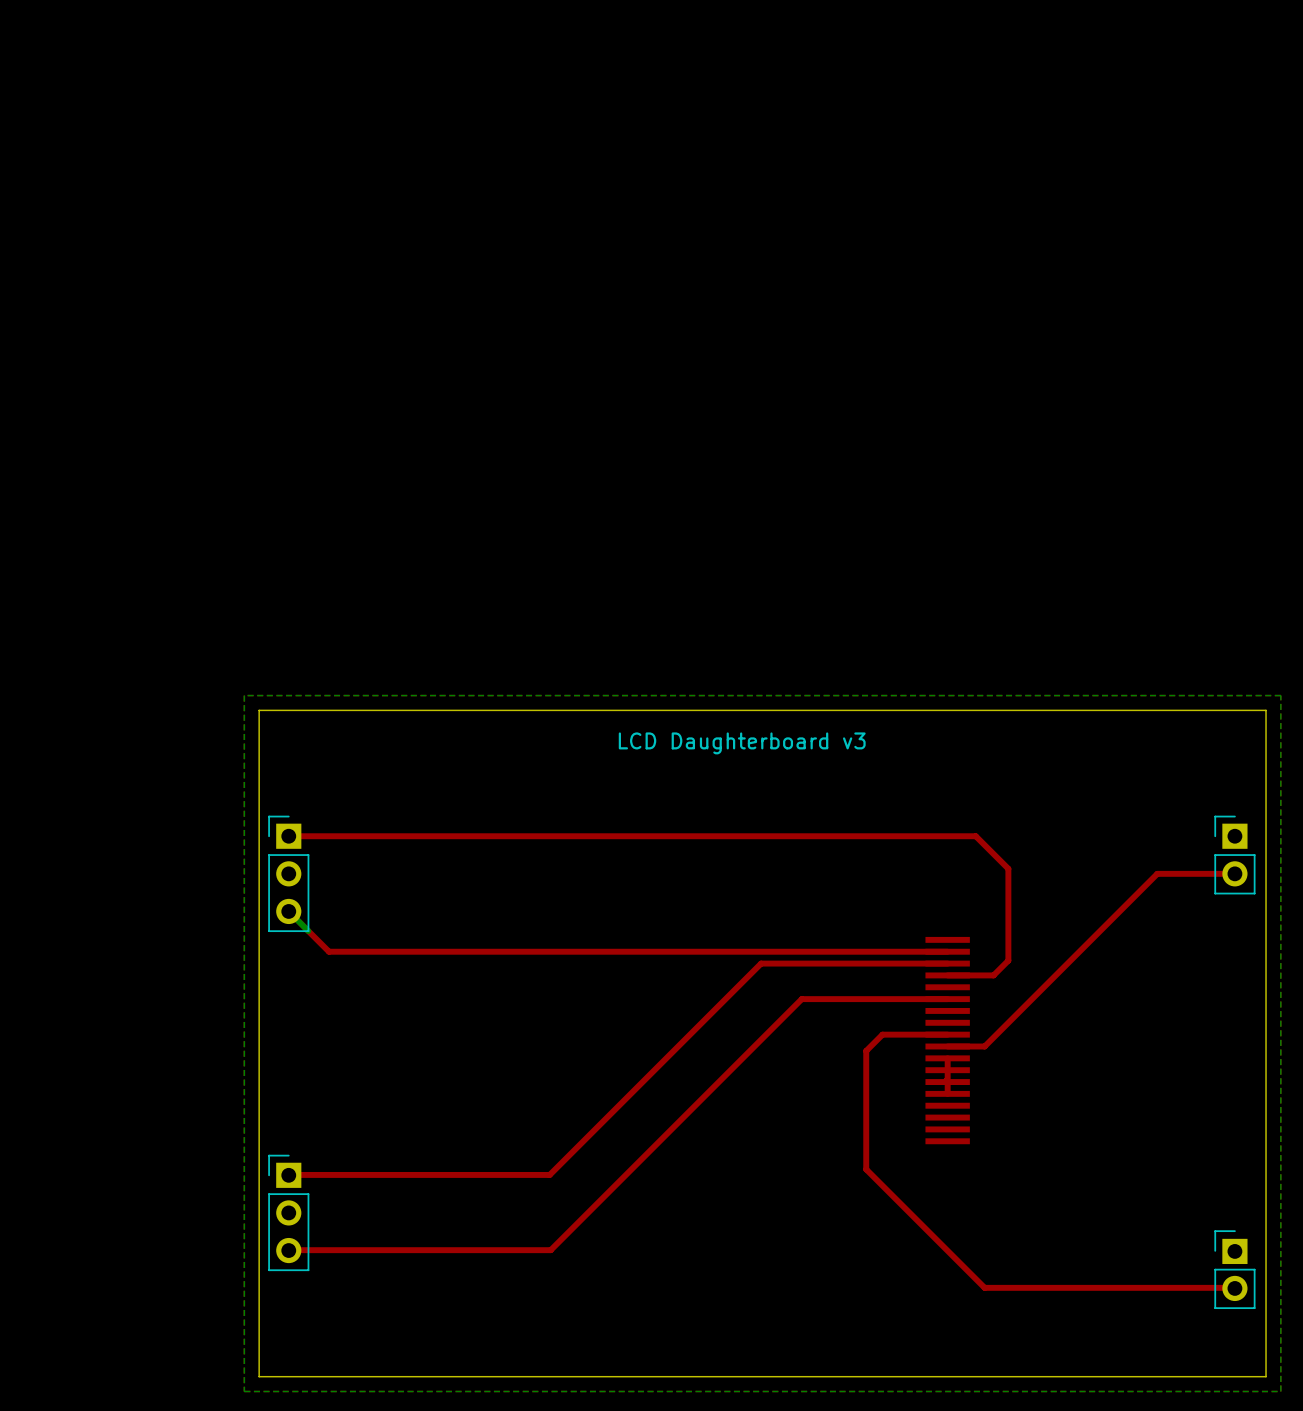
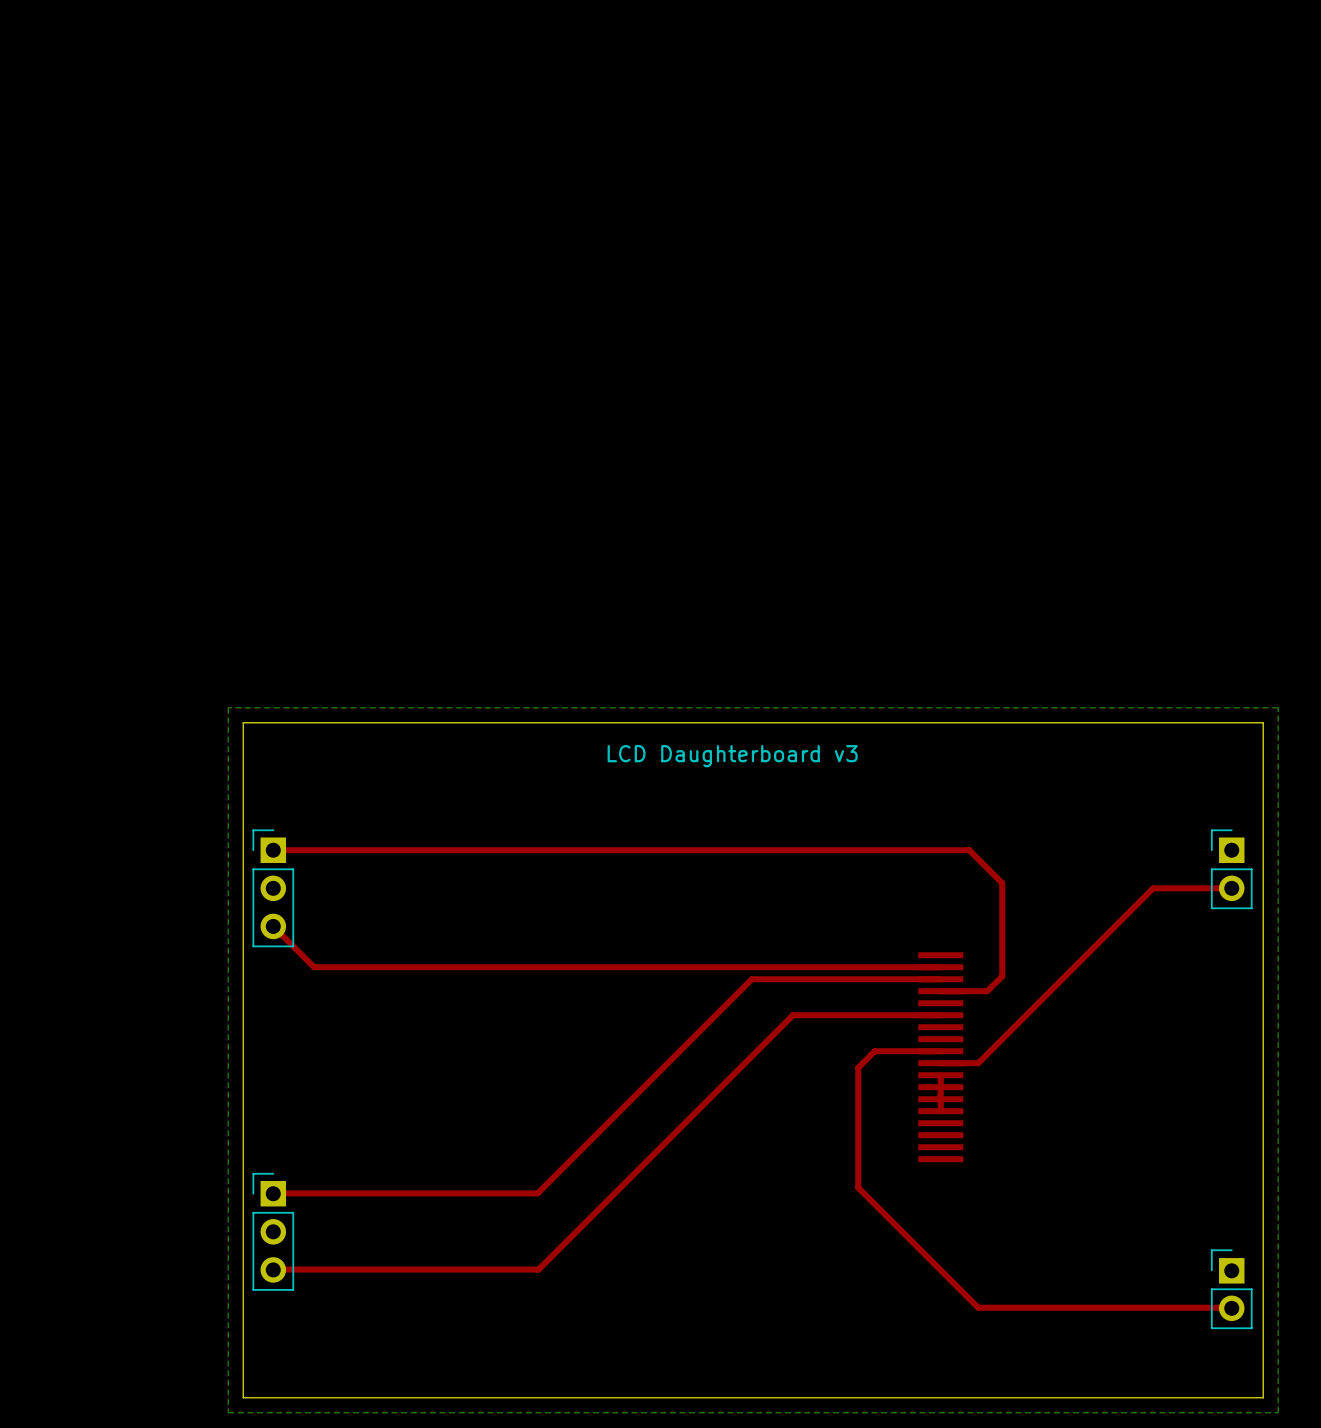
bottom track: (288, 911) (308, 931) -> none

